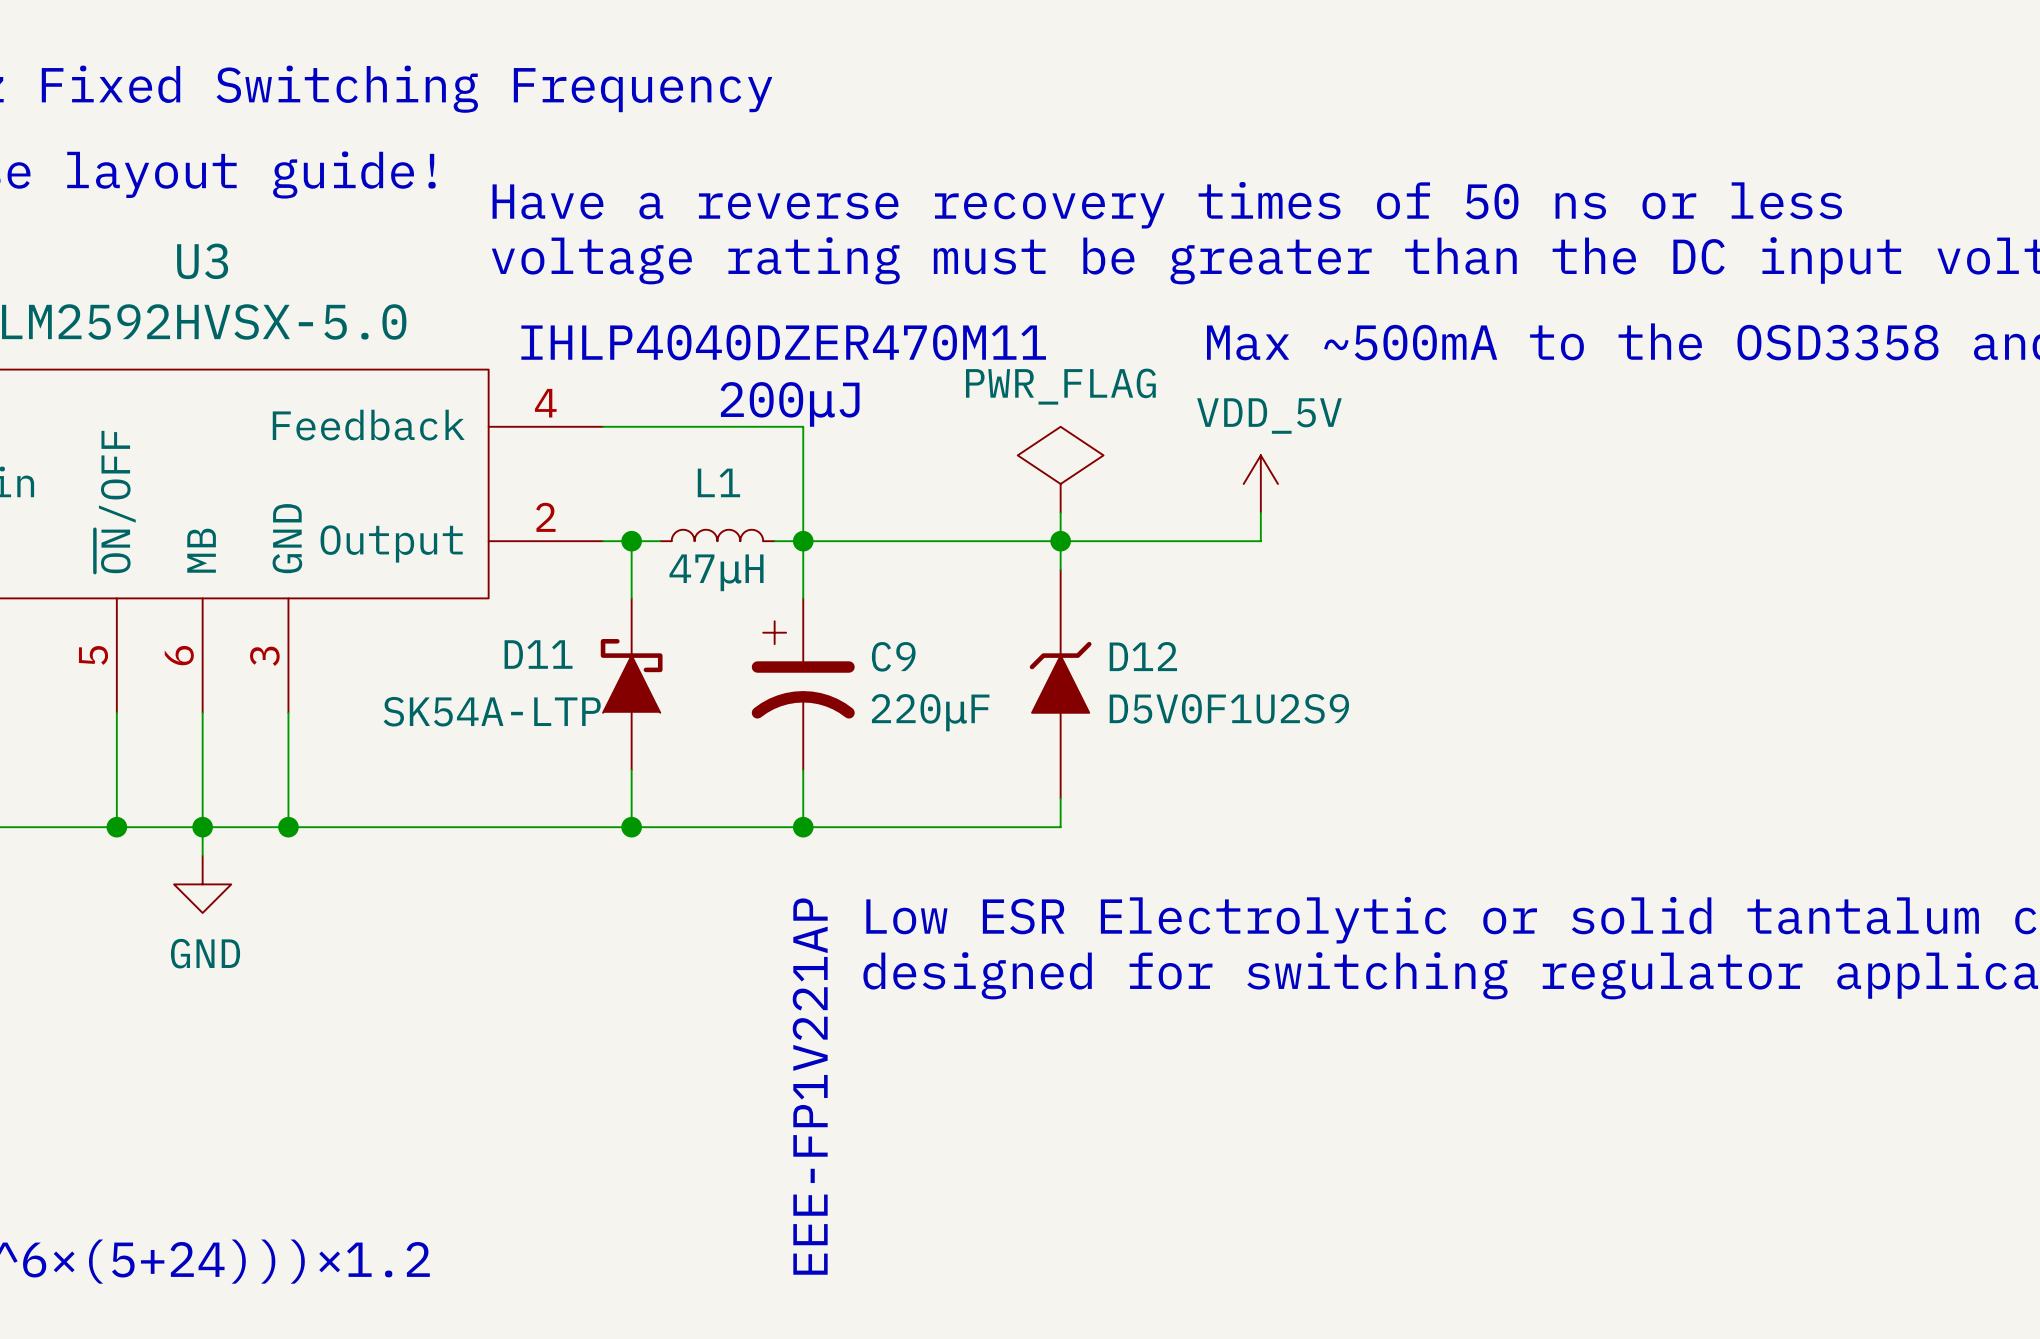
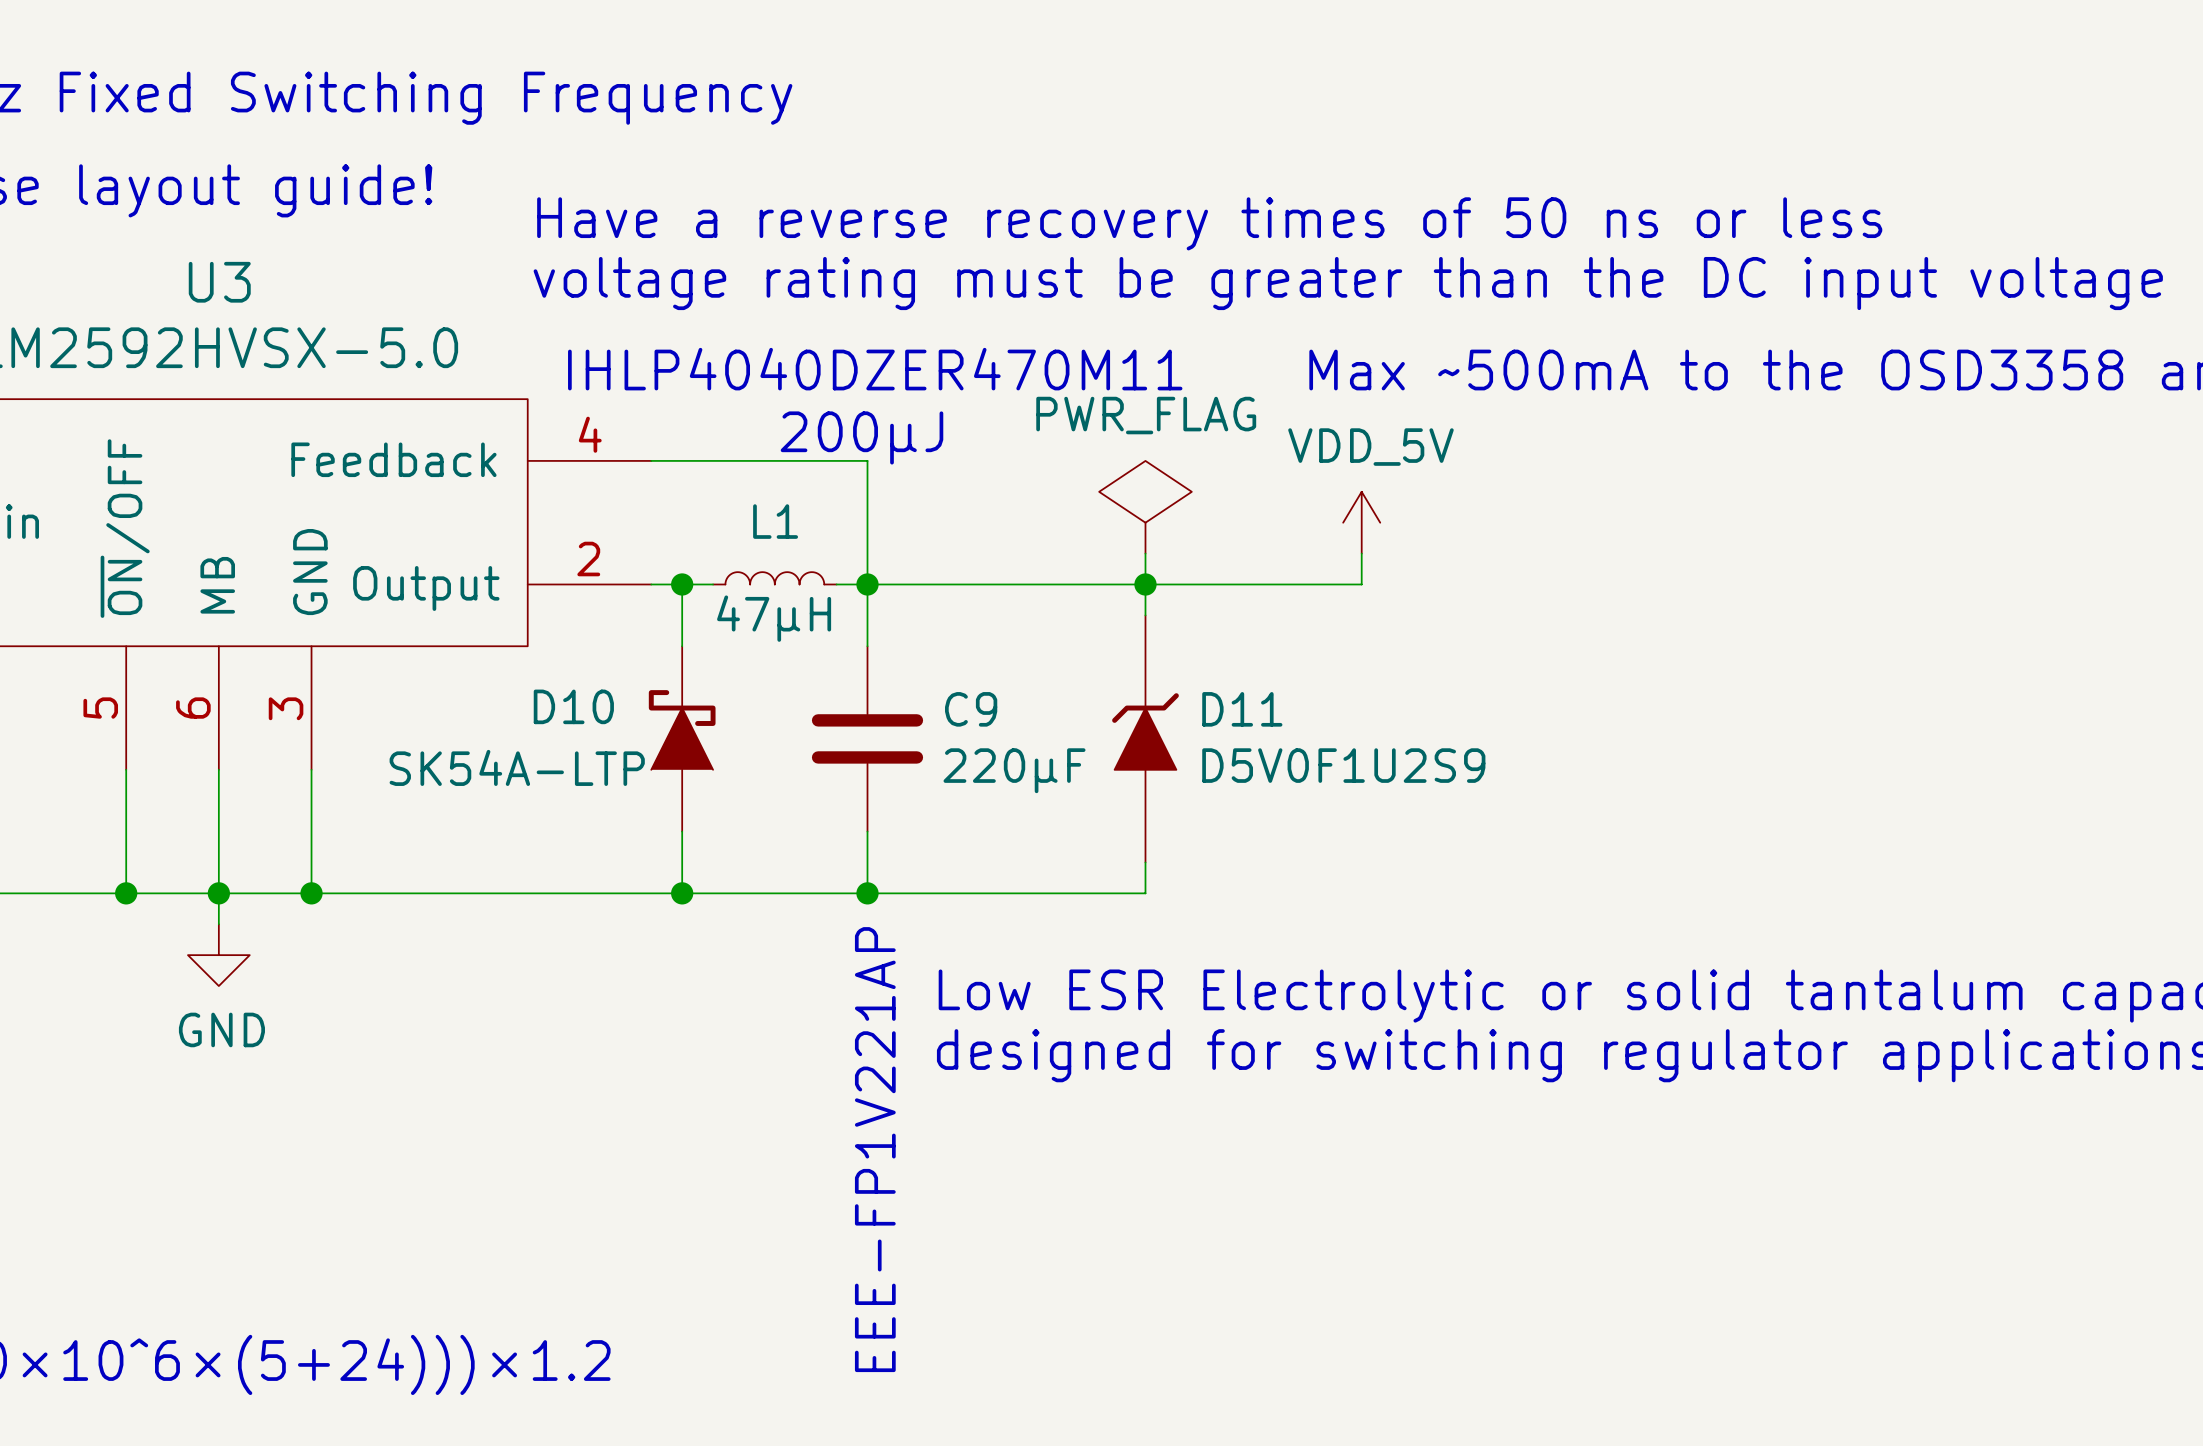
C9 symbol: [751, 598, 855, 770] -> [811, 646, 924, 832]
D11 name: D11 (538, 654) -> D10 (573, 706)
D12 name: D12 (1143, 656) -> D11 (1242, 709)

